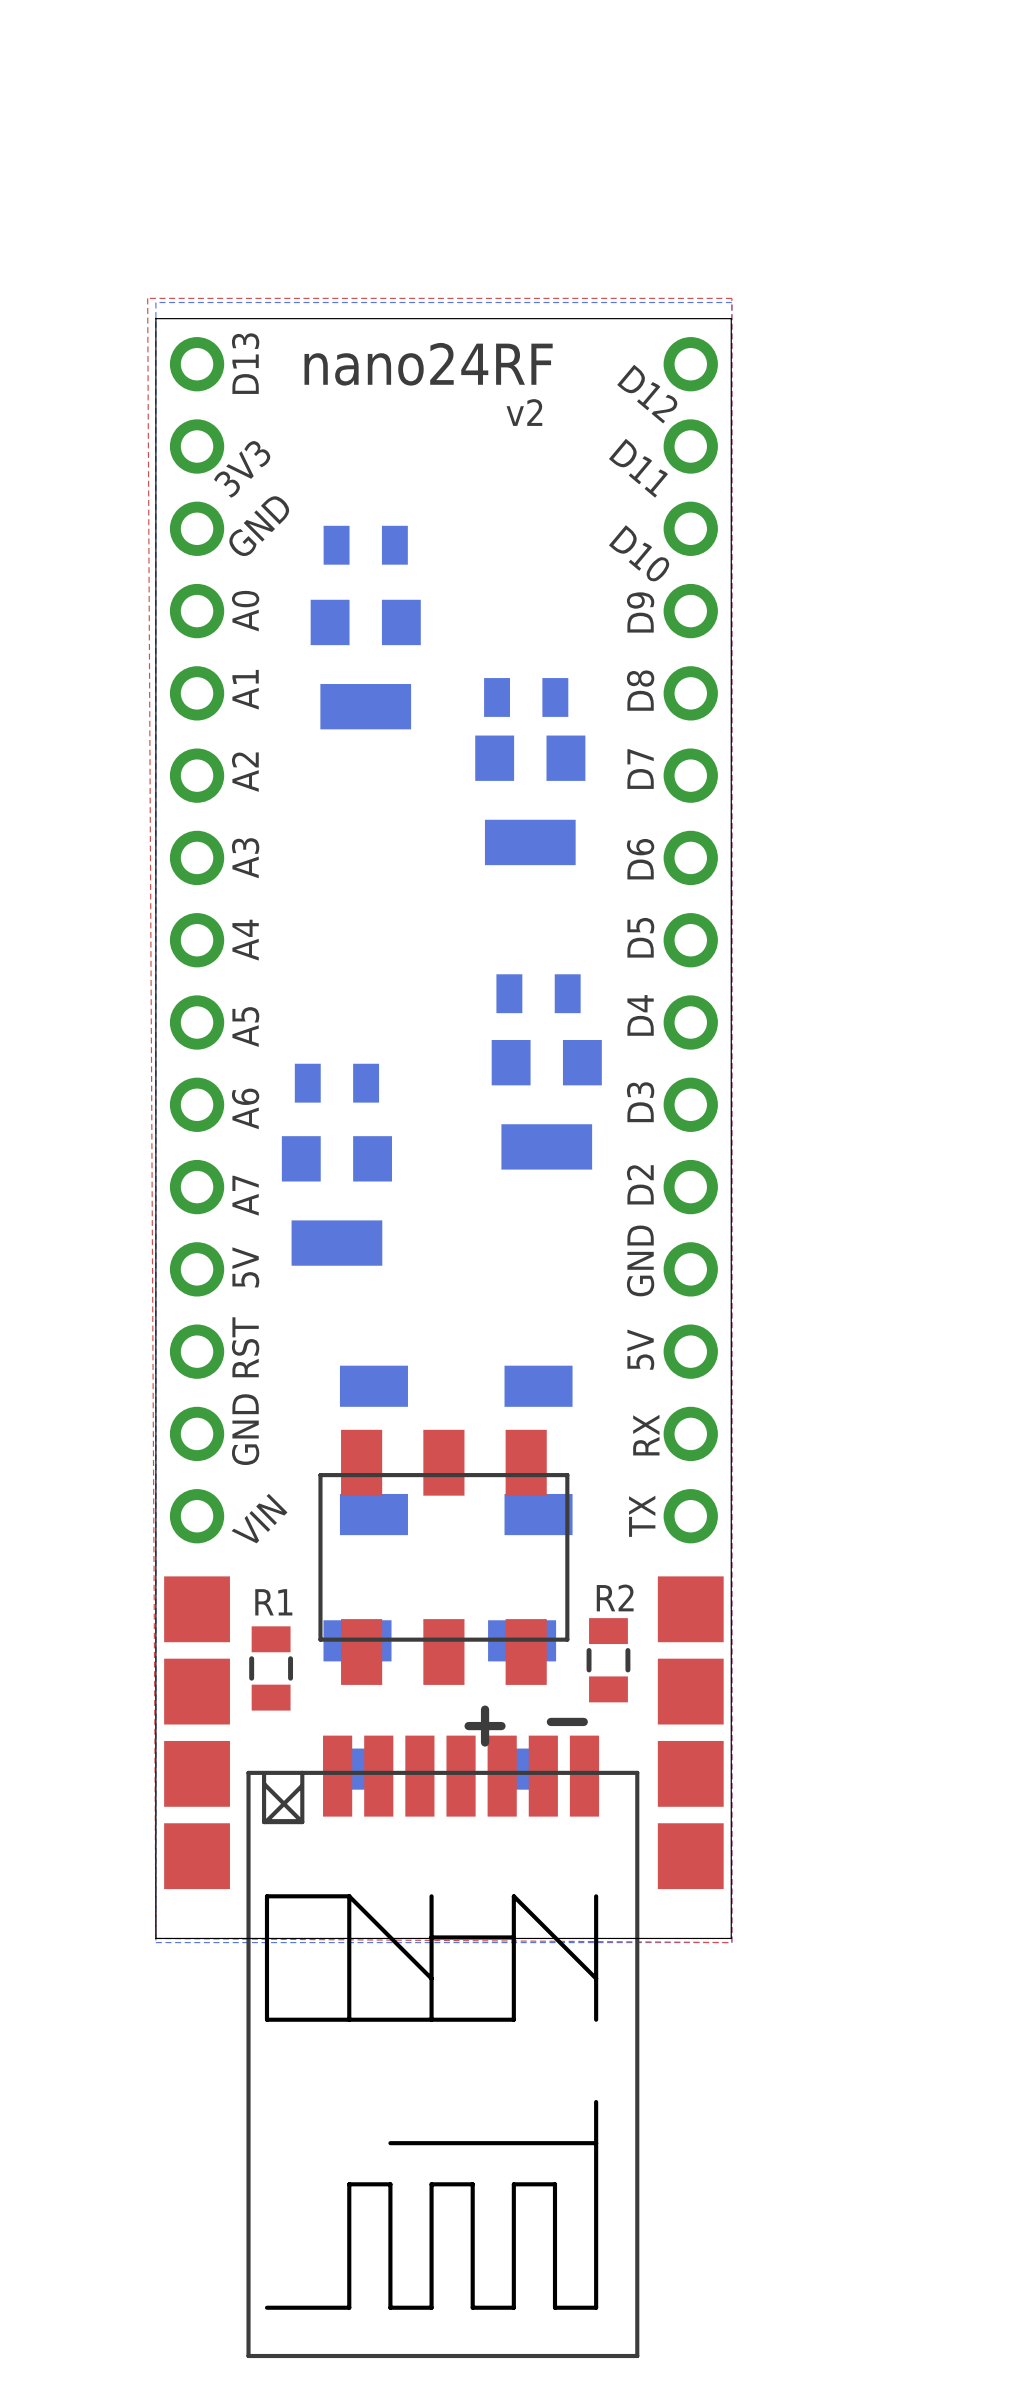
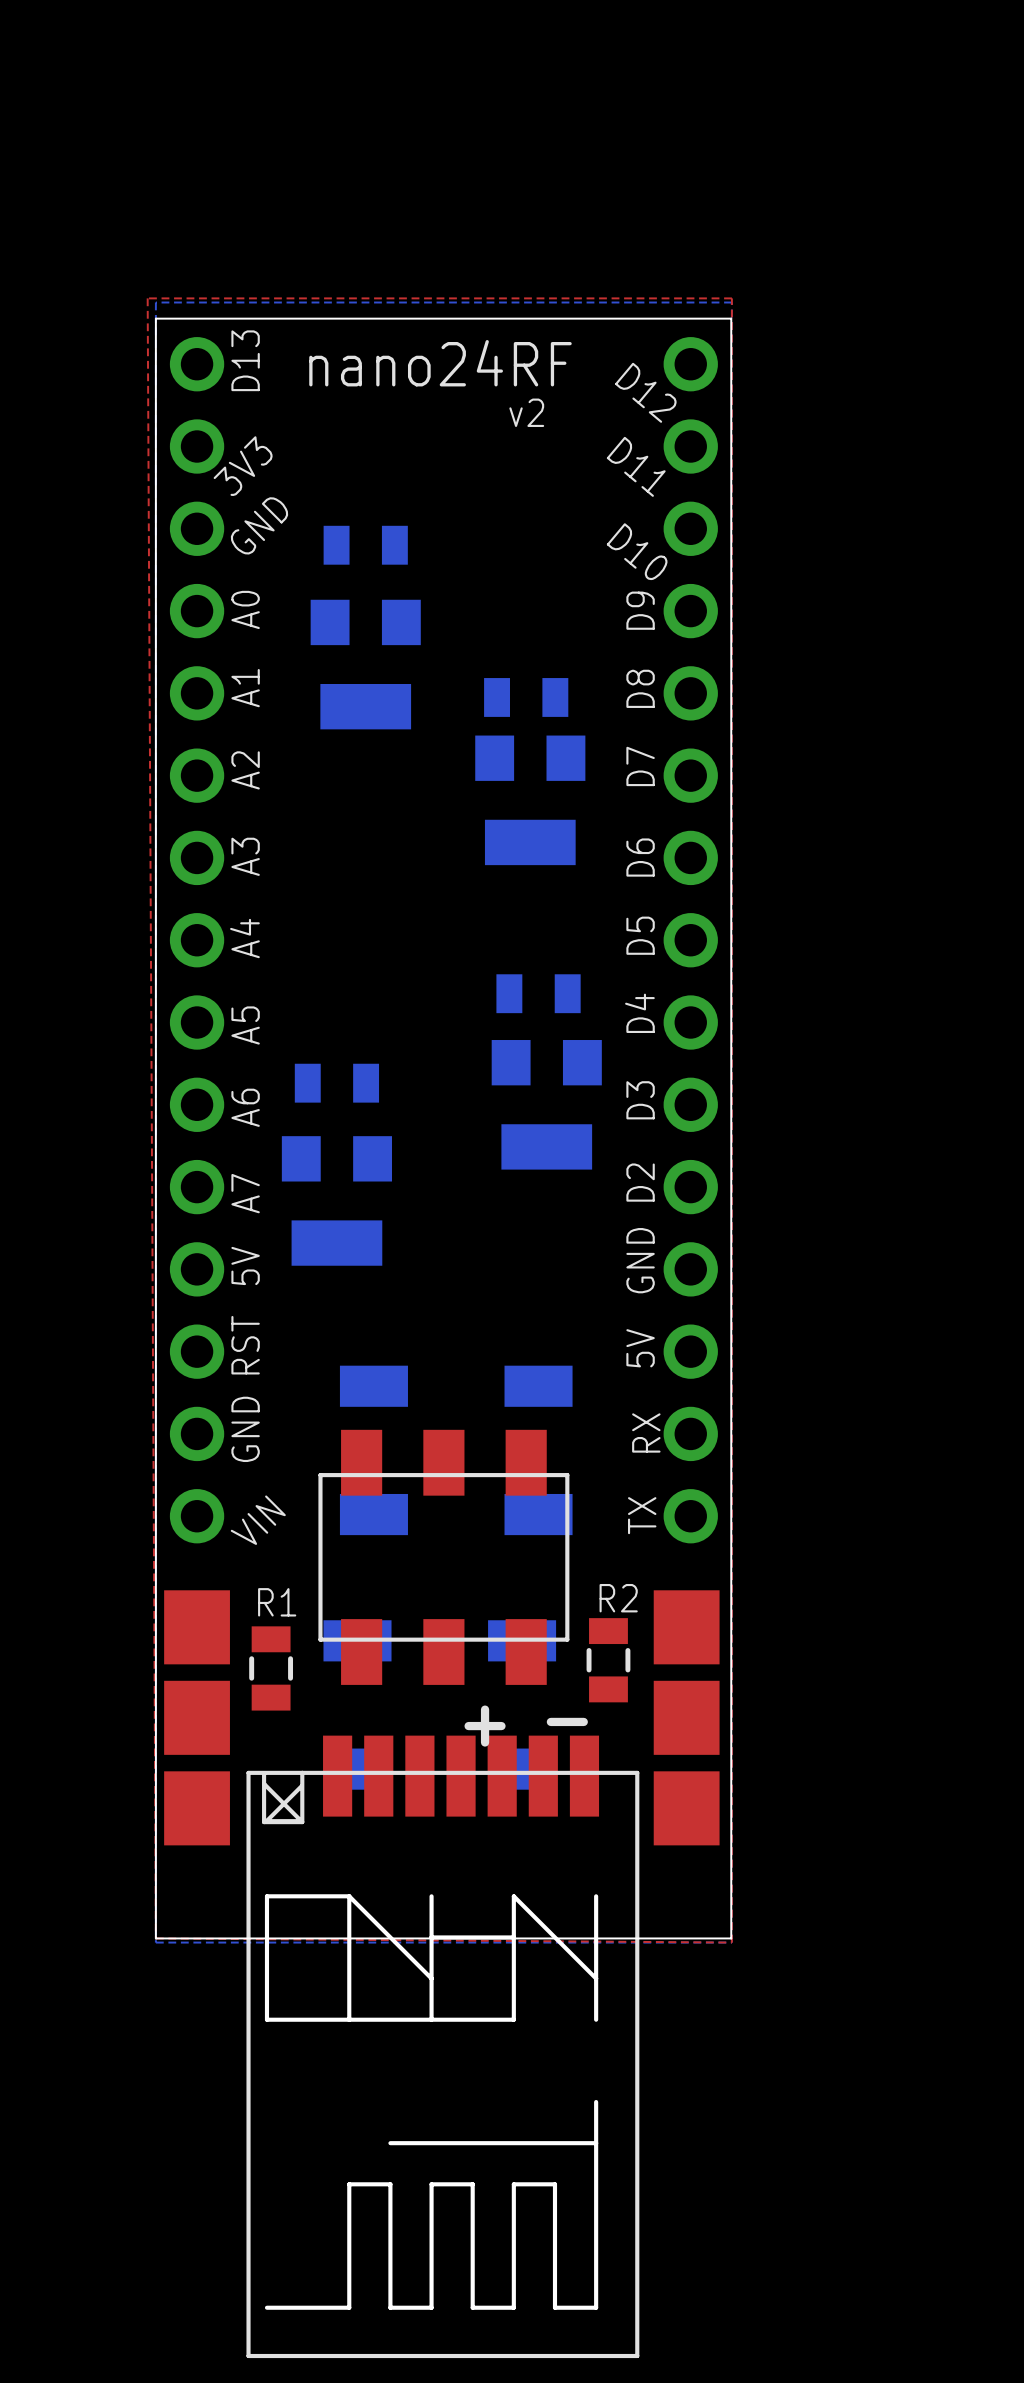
part footprint: [164, 1576, 230, 1890] -> [164, 1590, 230, 1846]
part footprint: [657, 1576, 724, 1890] -> [653, 1590, 720, 1846]

